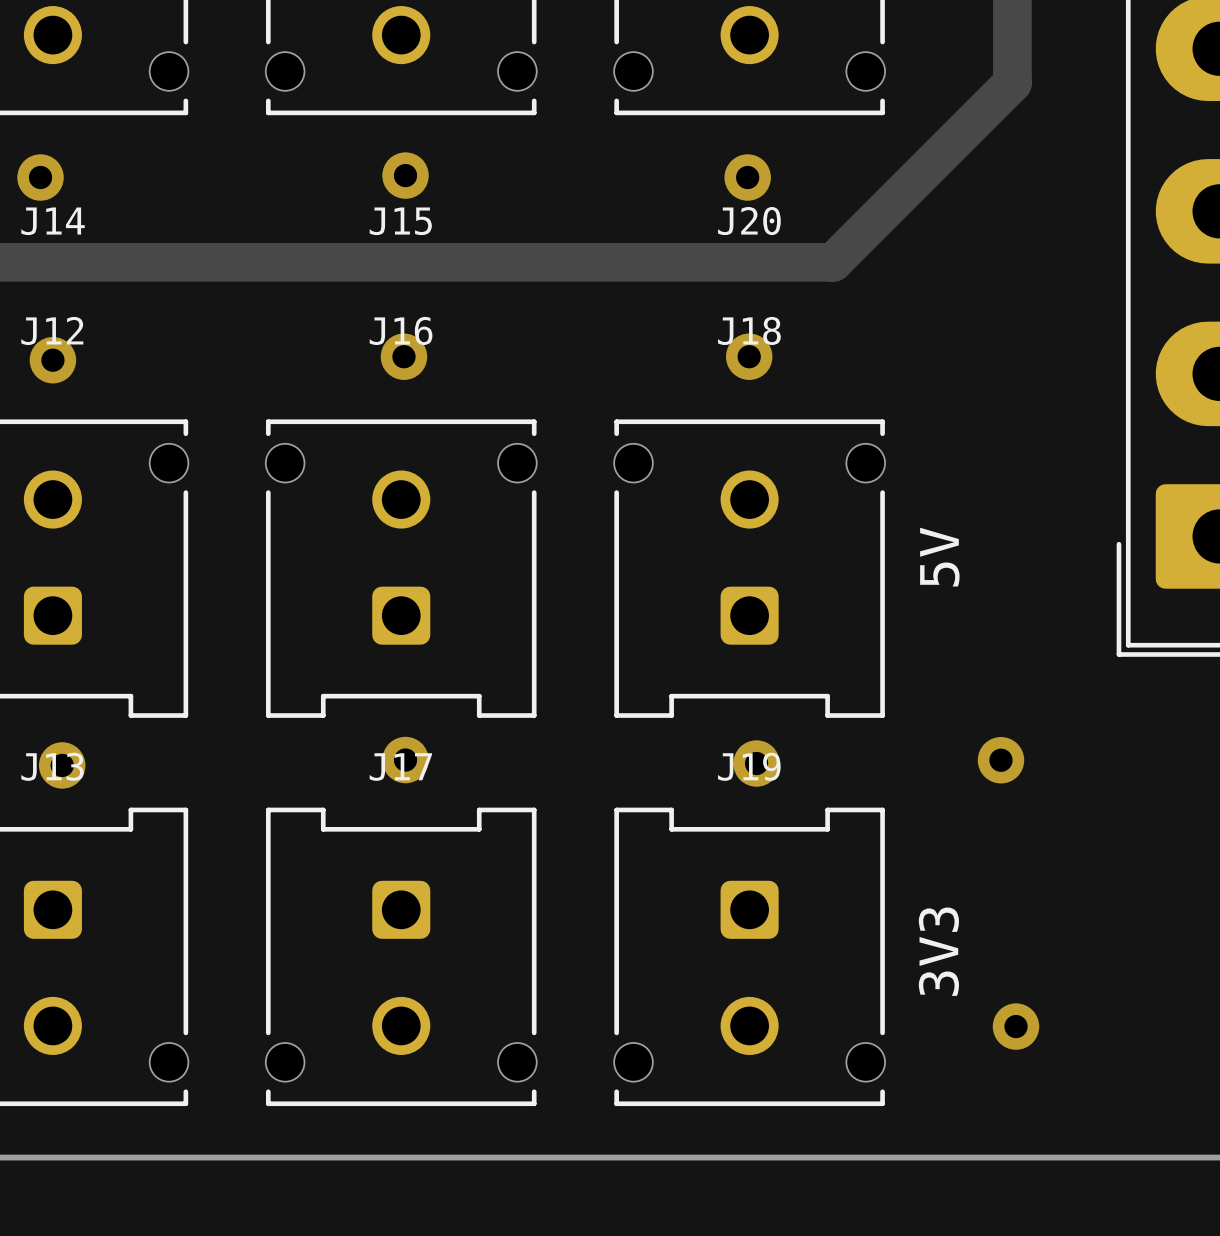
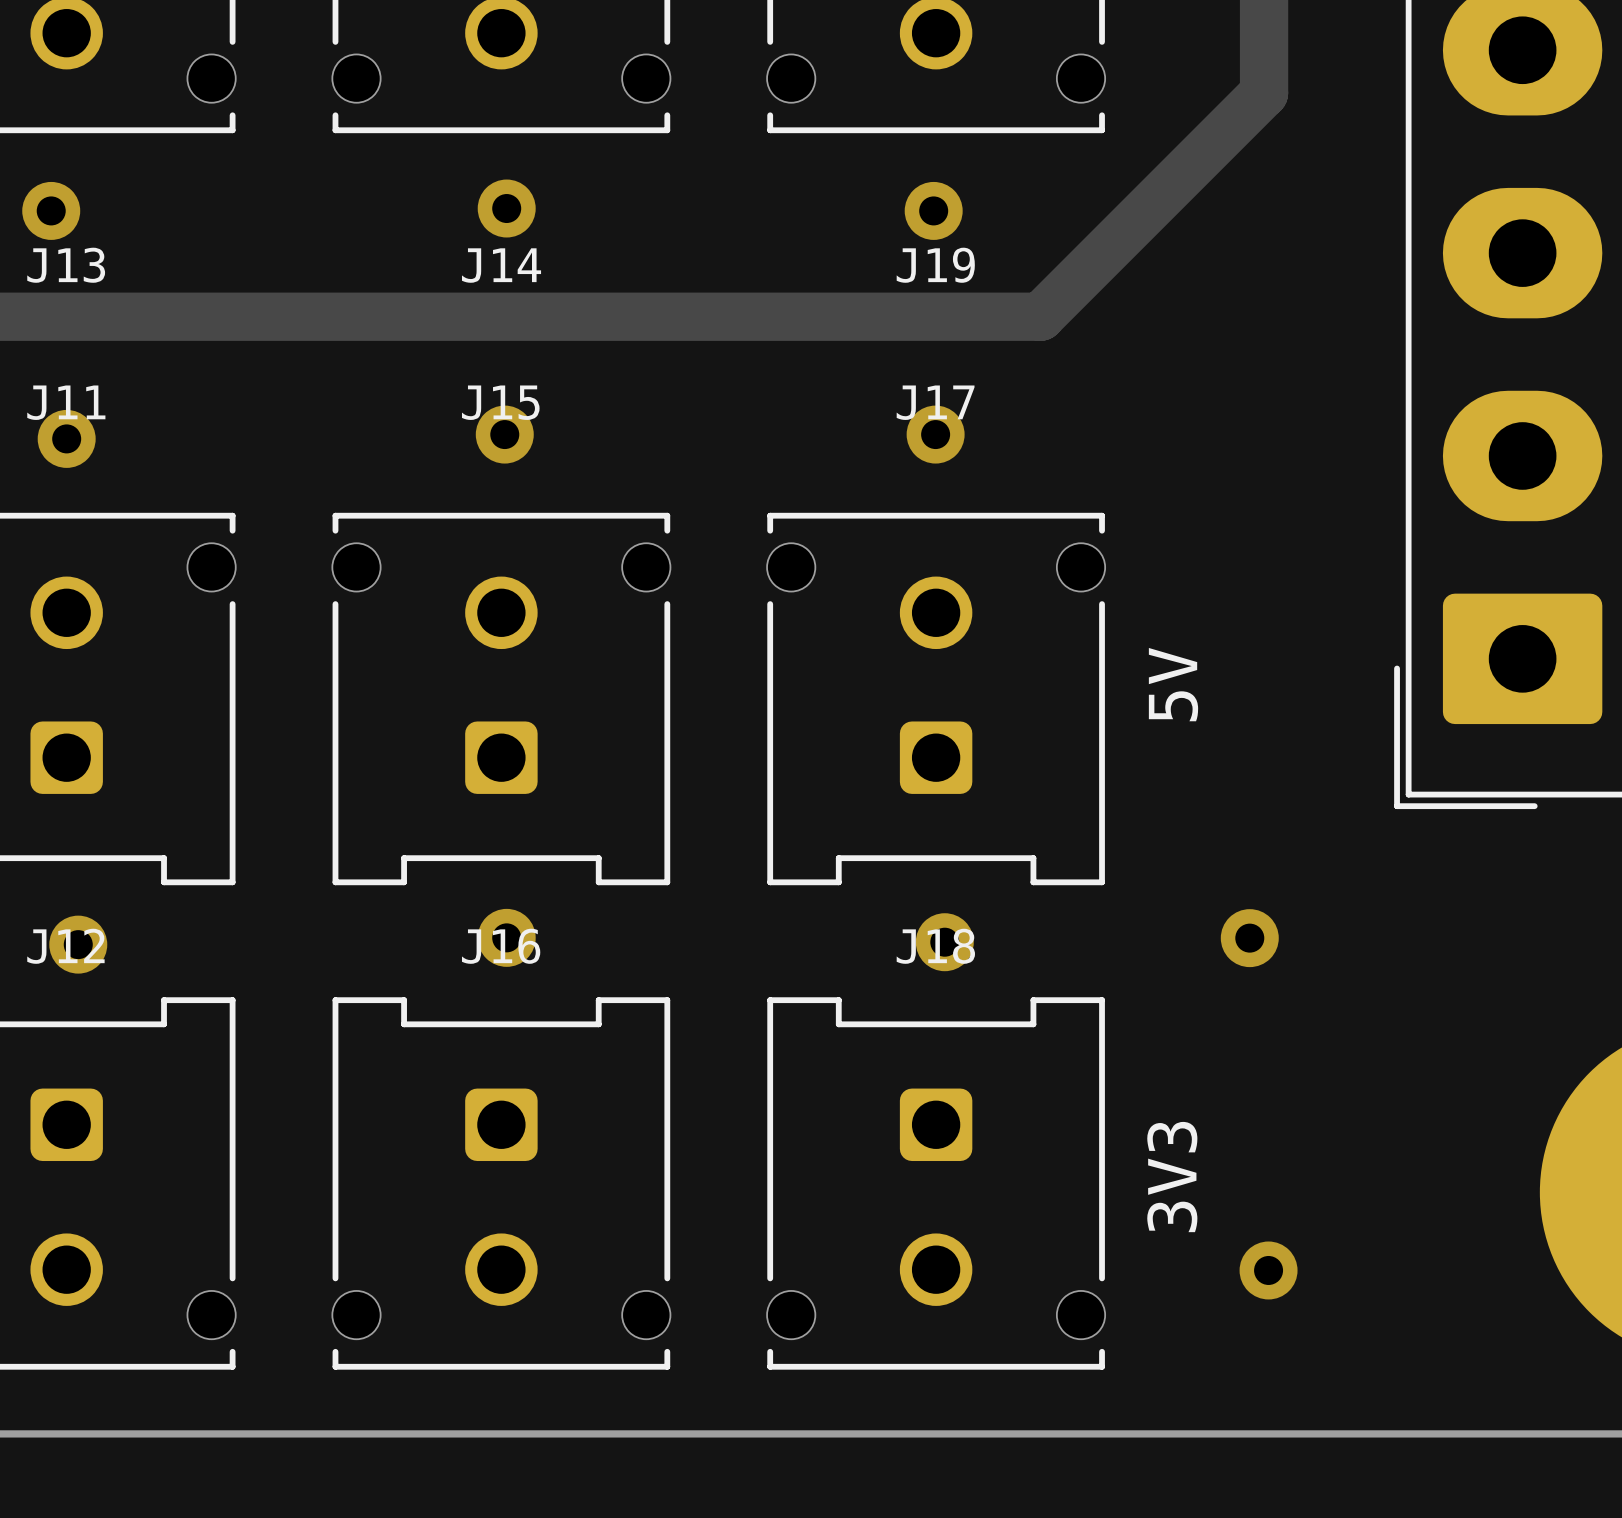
J14 name: J14 (53, 221) -> J13 (66, 265)
J15 name: J15 (400, 221) -> J14 (501, 265)
J20 name: J20 (749, 221) -> J19 (935, 265)
J12 name: J12 (52, 330) -> J11 (66, 402)
J16 name: J16 (401, 330) -> J15 (500, 402)
J18 name: J18 (749, 330) -> J17 (935, 402)
J13 name: J13 (52, 766) -> J12 (65, 946)
J19 name: J19 (749, 766) -> J18 (935, 946)
J17 name: J17 (400, 767) -> J16 (501, 946)

